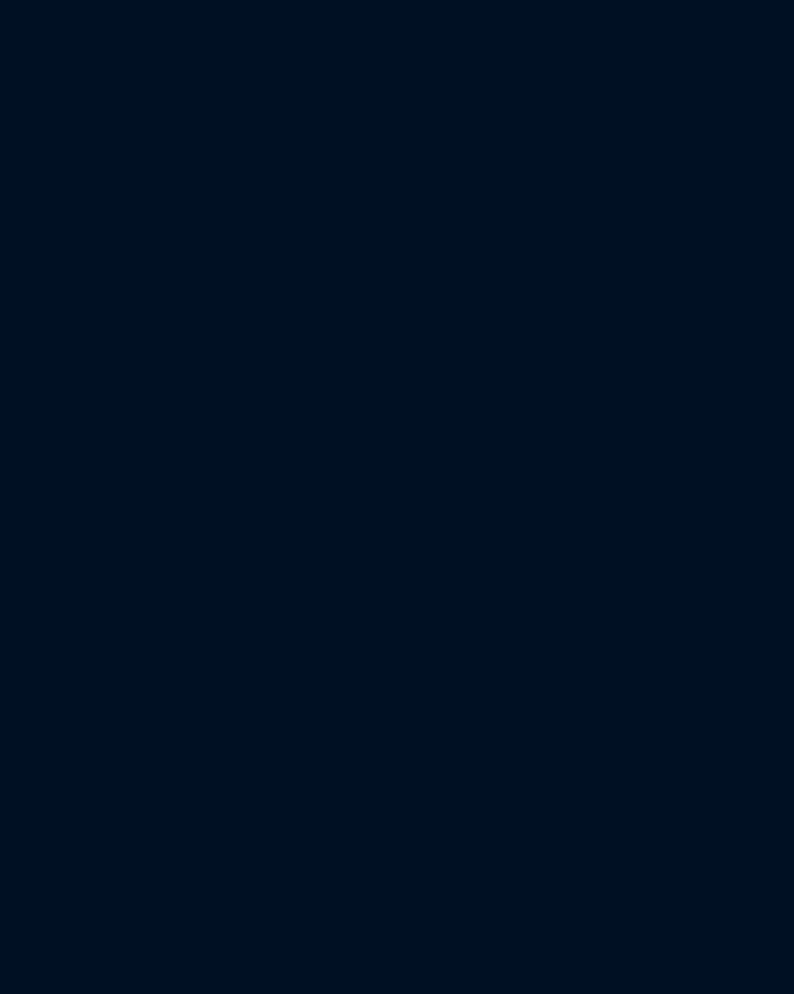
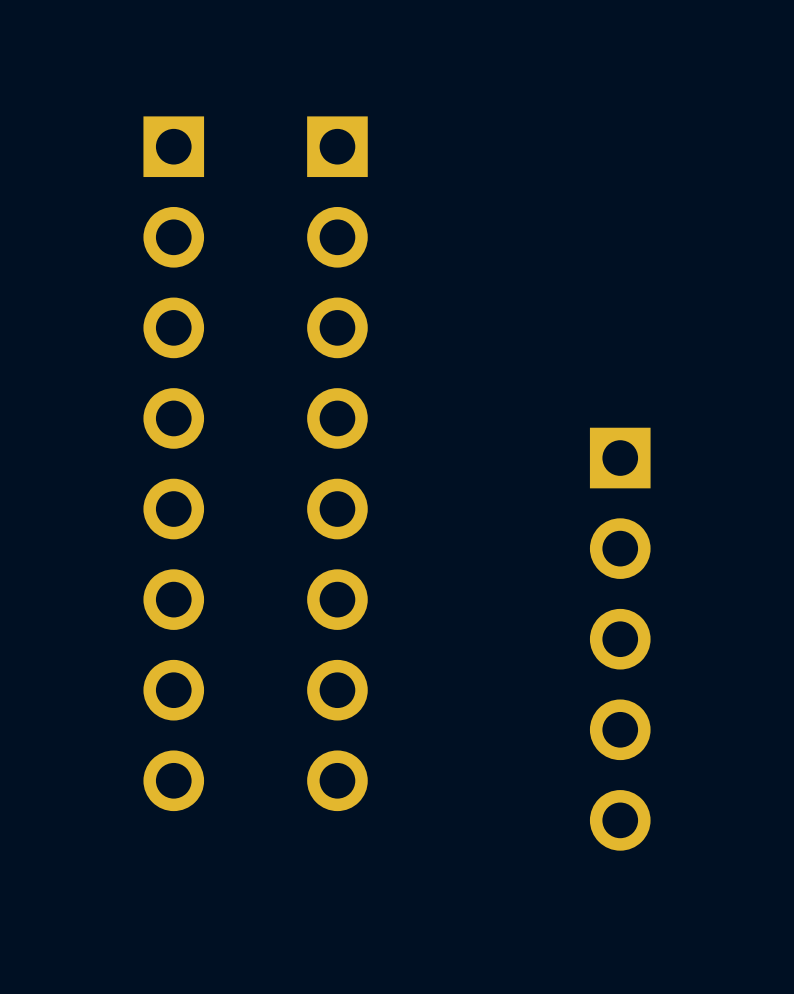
part: none -> (173, 463)
part: none -> (337, 463)
part: none -> (620, 639)

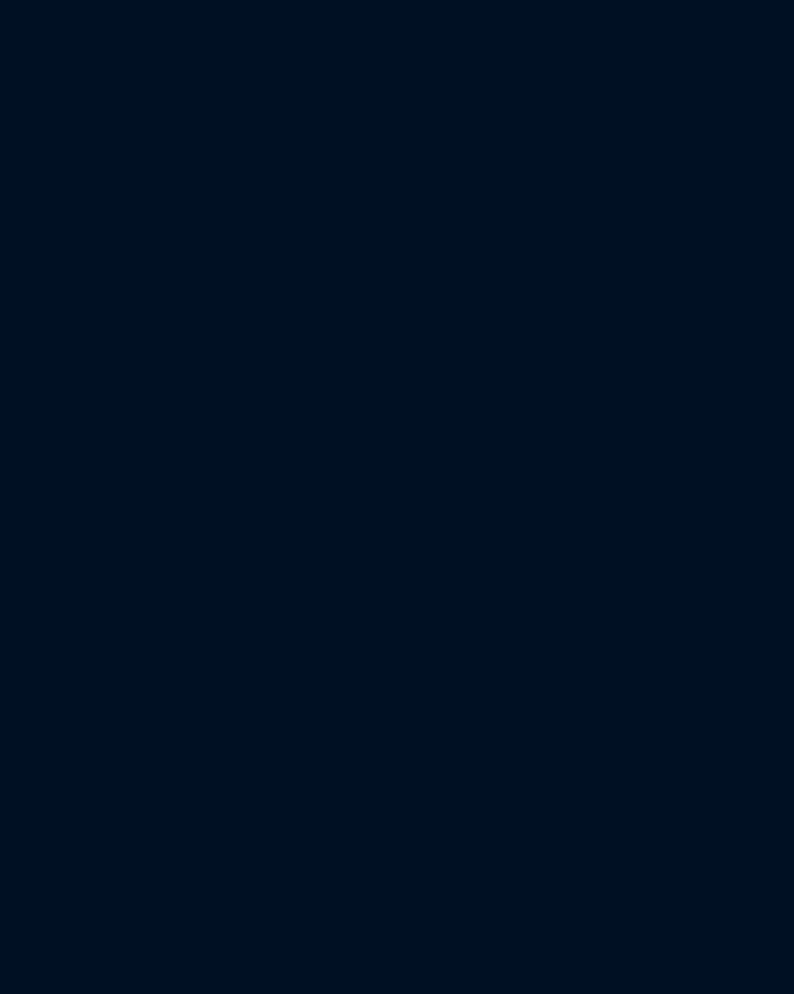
part: (173, 463) -> none
part: (337, 463) -> none
part: (620, 639) -> none

